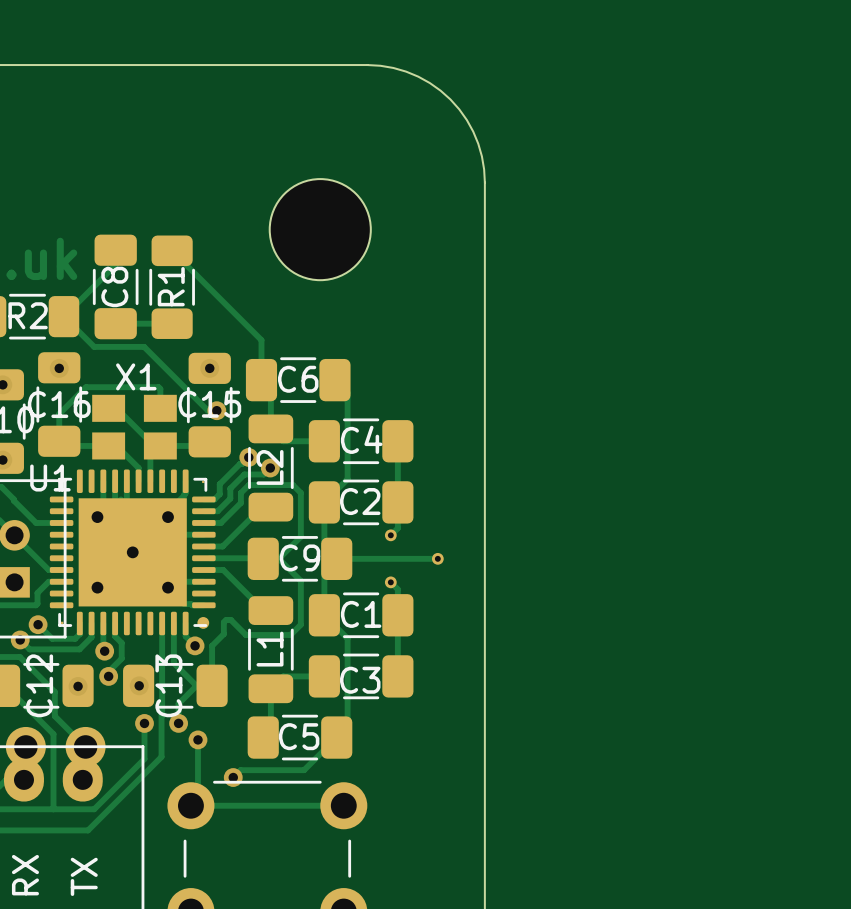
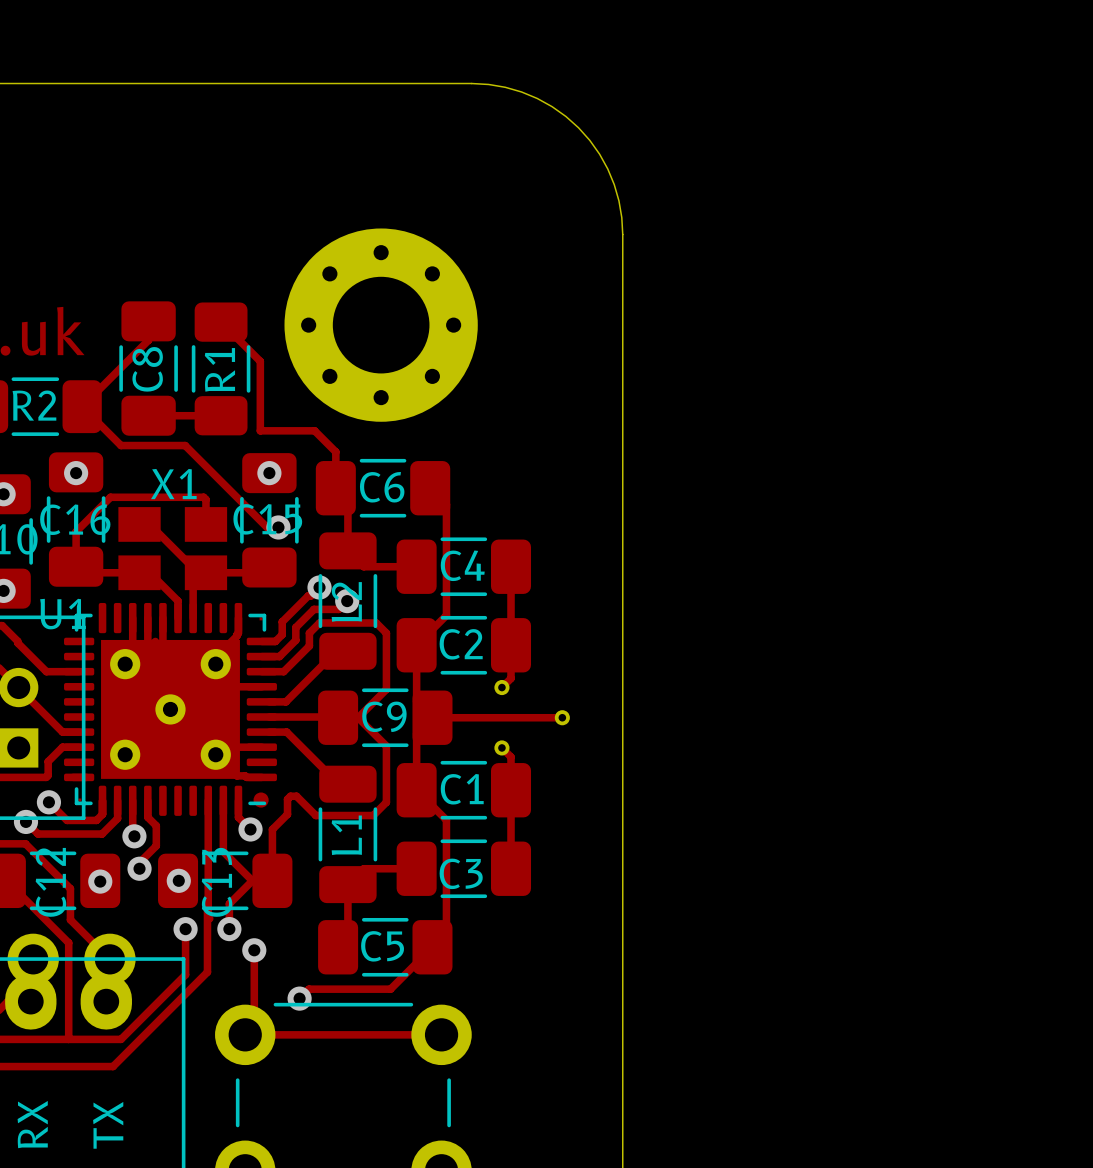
part: (320, 229) -> none
part: none -> (381, 325)
track: (202, 281) (261, 340) (261, 351) -> (260, 361) (260, 430) (314, 430) (335, 451)

